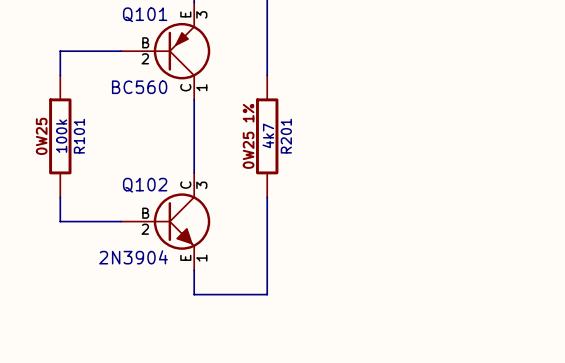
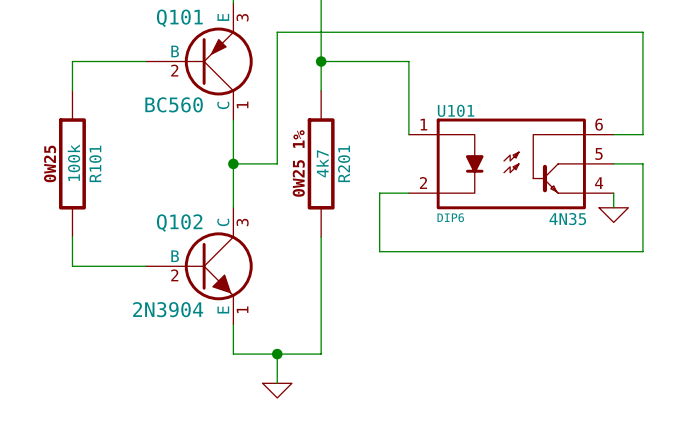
wire: none -> (321, 61) (408, 61) (408, 134)
junction: none -> (321, 61)
wire: none -> (613, 134) (642, 134) (642, 32) (277, 32) (277, 163) (233, 163)
junction: none -> (233, 163)
U101: none -> 4N35 (511, 163)
wire: none -> (613, 163) (642, 163) (642, 251) (379, 251) (379, 193) (408, 193)
wire: none -> (613, 193) (613, 207)
power symbol: none -> (613, 215)
wire: none -> (277, 354) (277, 383)
junction: none -> (277, 354)
power symbol: none -> (277, 390)

